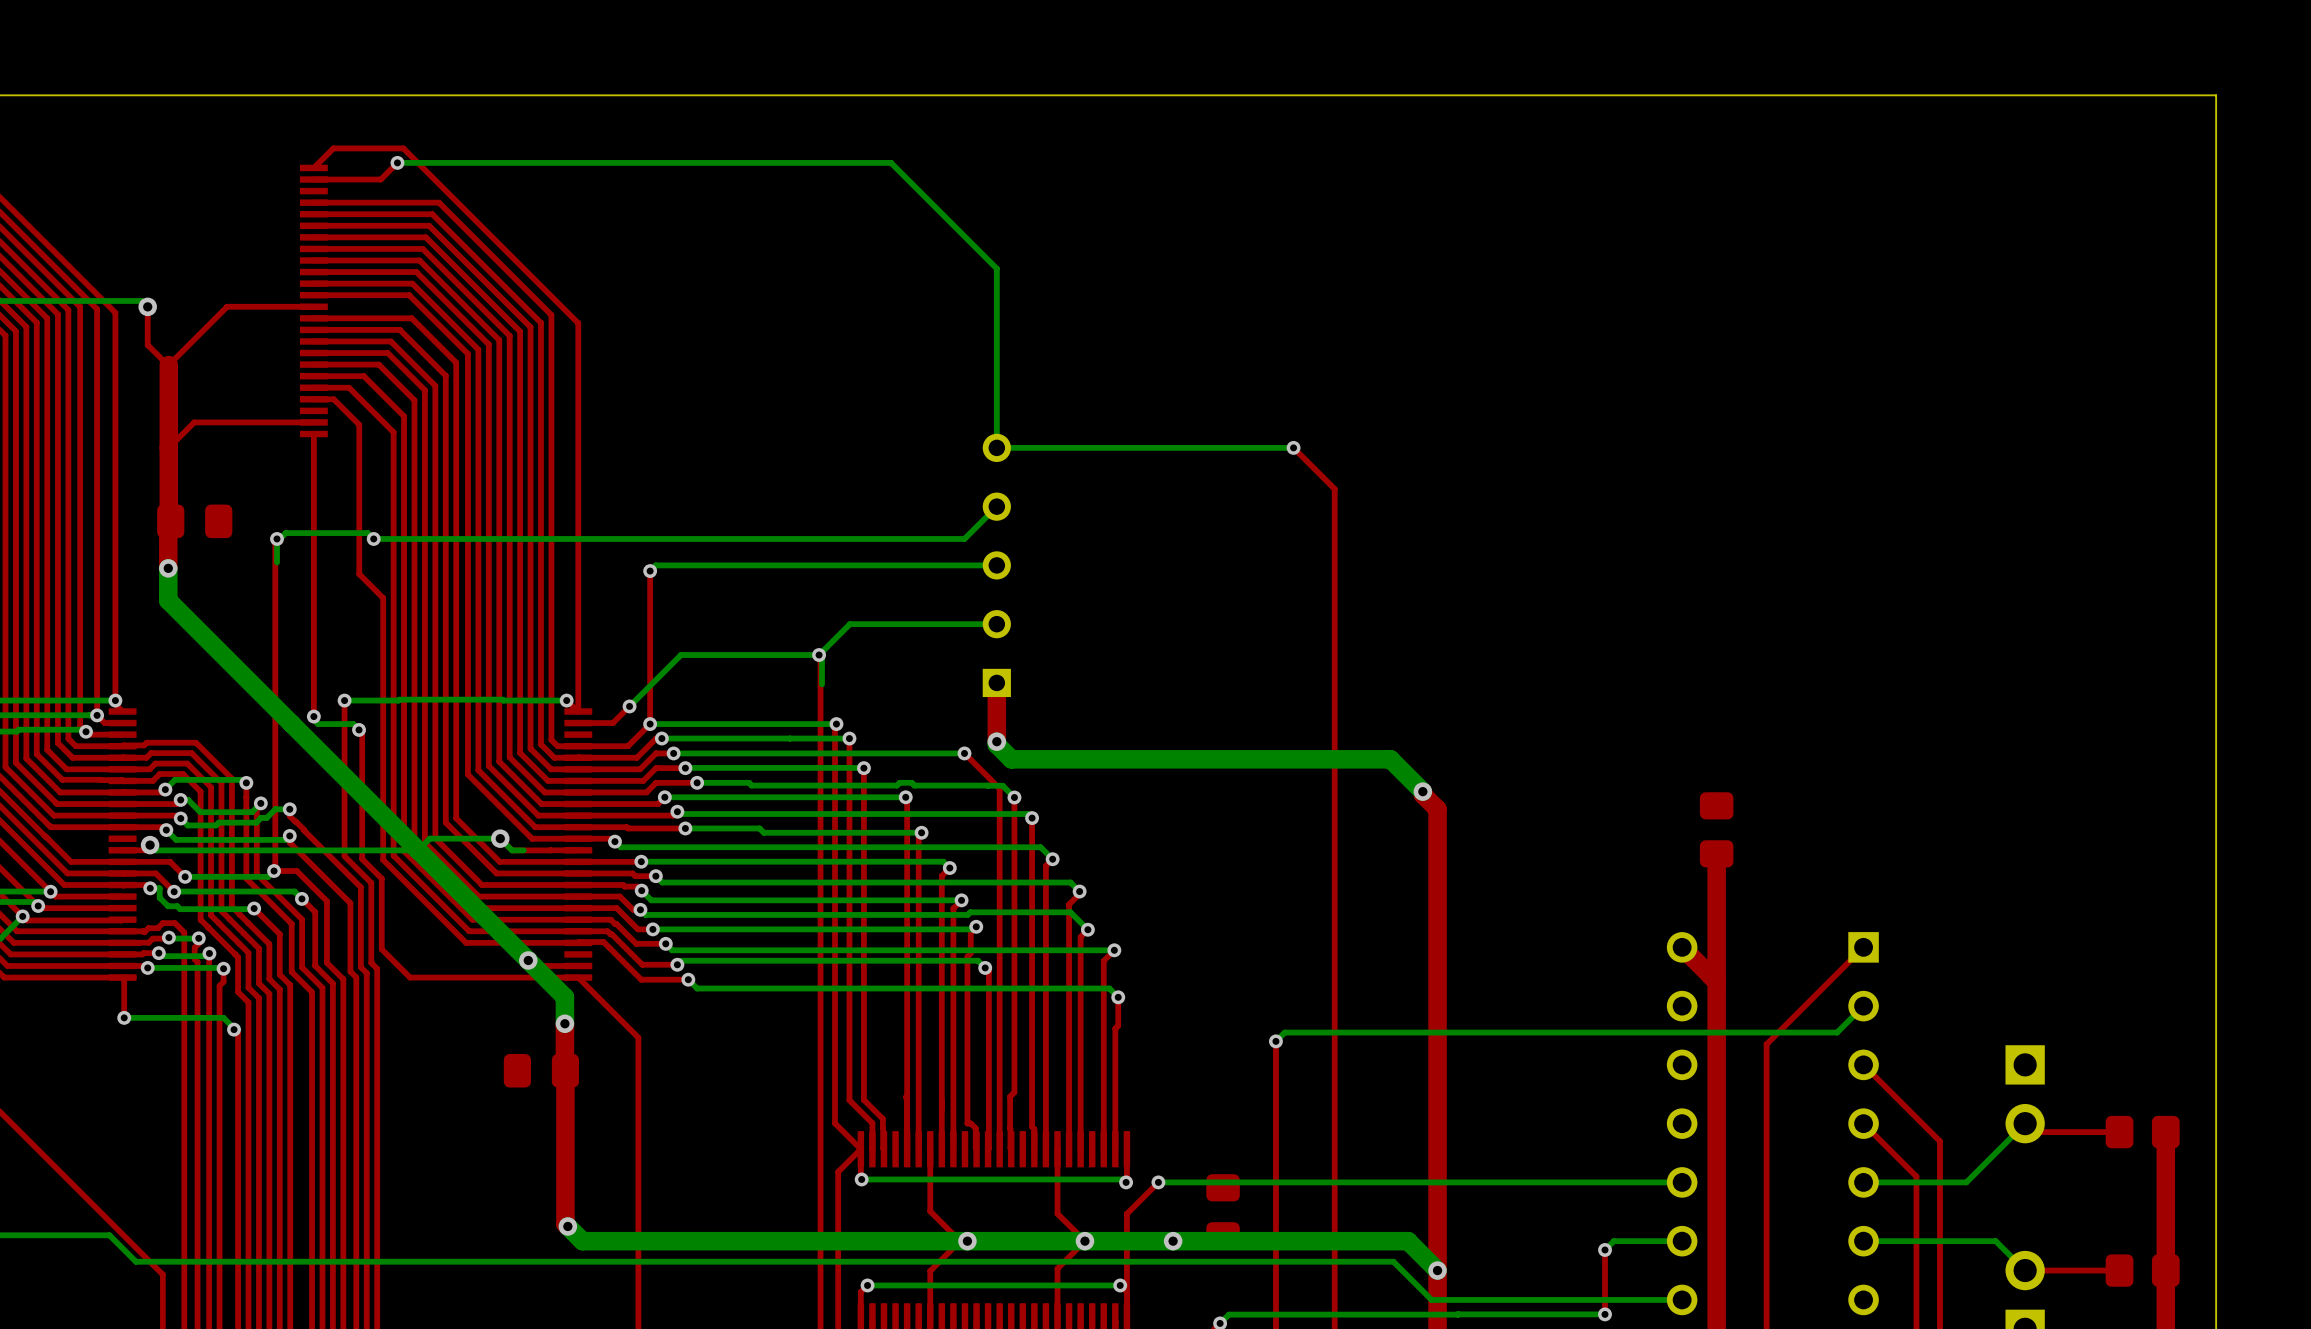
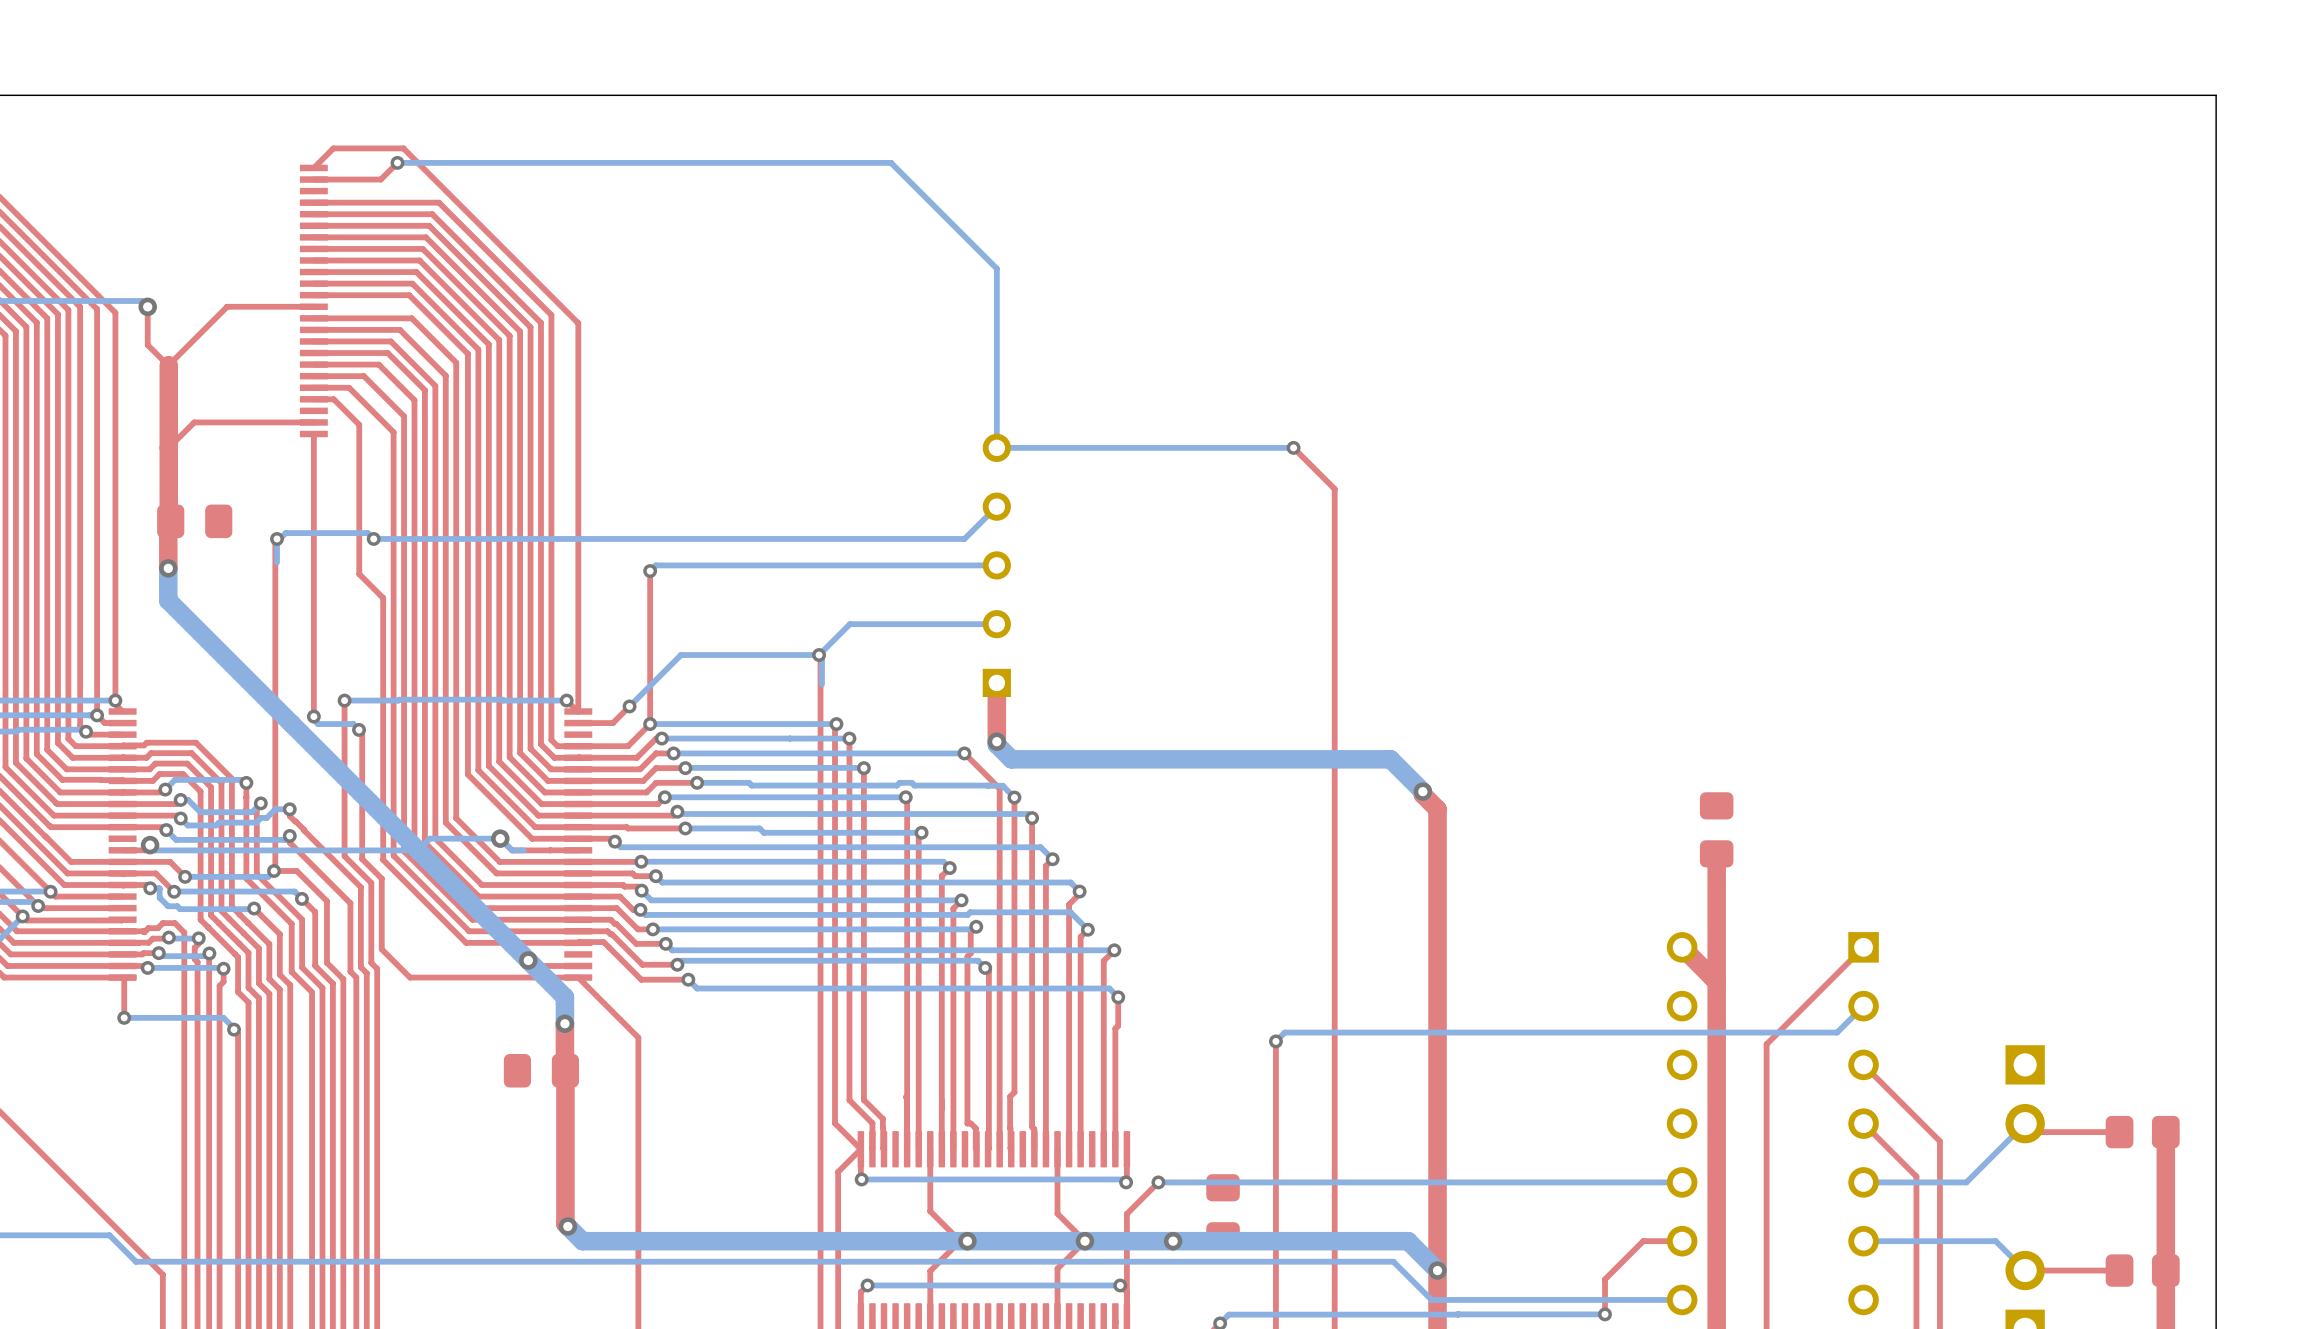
bottom track: (1682, 1241) (1613, 1241) (1605, 1249) -> none
top track: (1605, 1249) (1605, 1279) -> (1682, 1241) (1643, 1241) (1605, 1279)
via: (1605, 1249) -> none

